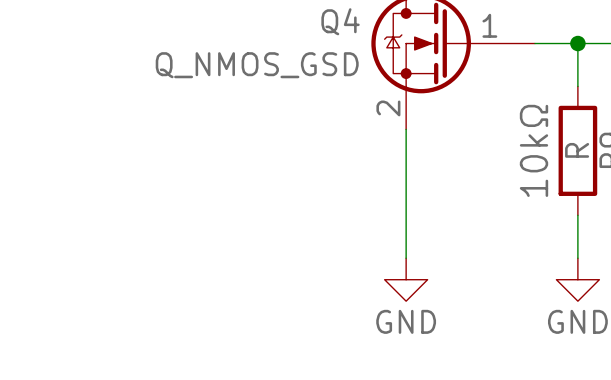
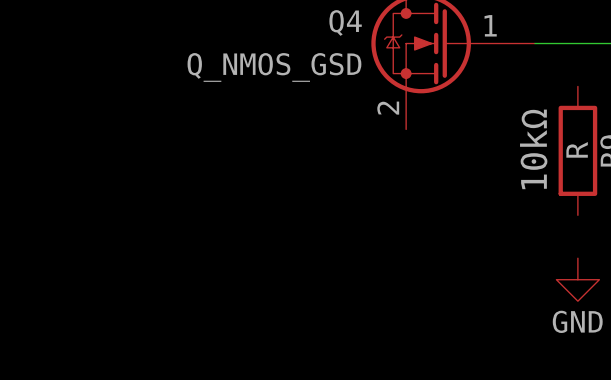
wire: (577, 43) (577, 86) -> none
junction: (577, 43) -> none
wire: (406, 129) (406, 258) -> none
wire: (577, 215) (577, 258) -> none
power symbol: GND (406, 279) -> none

